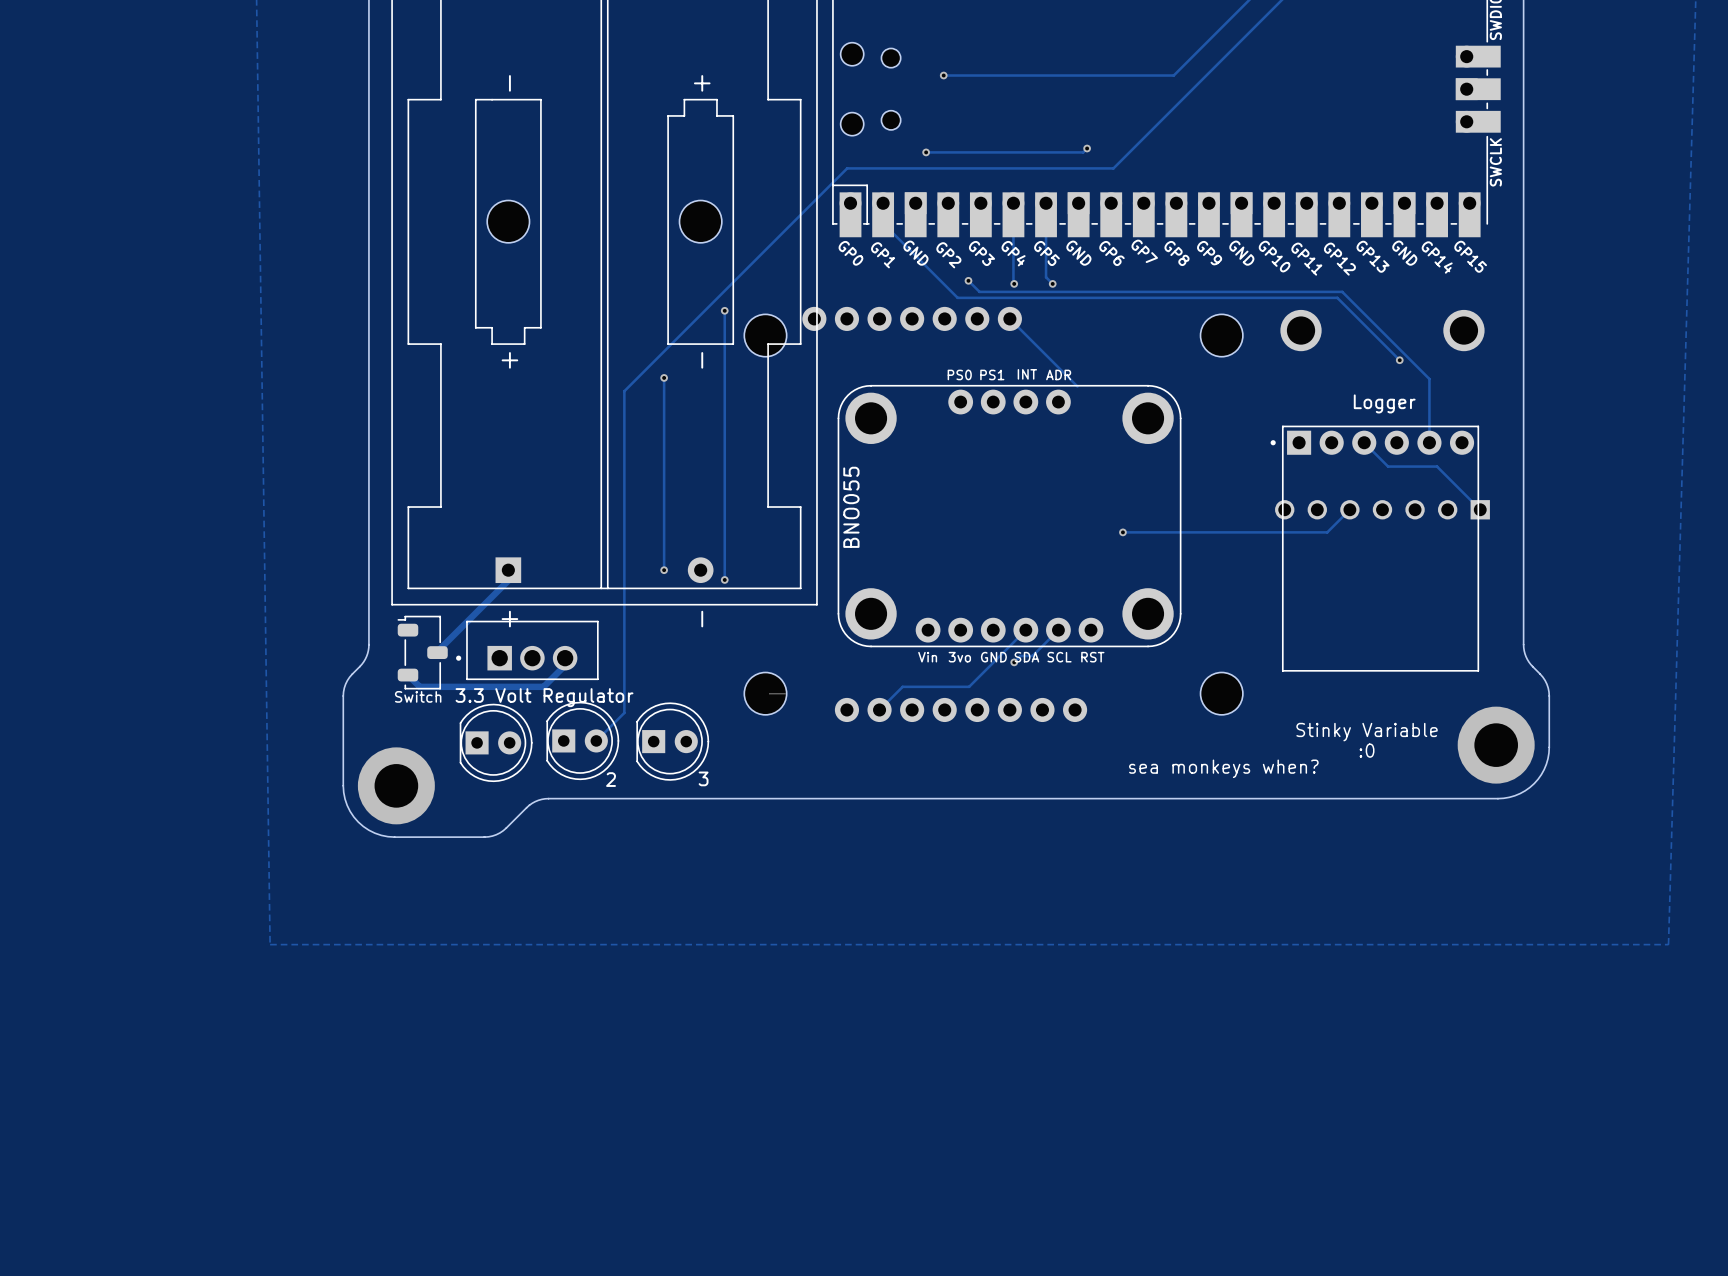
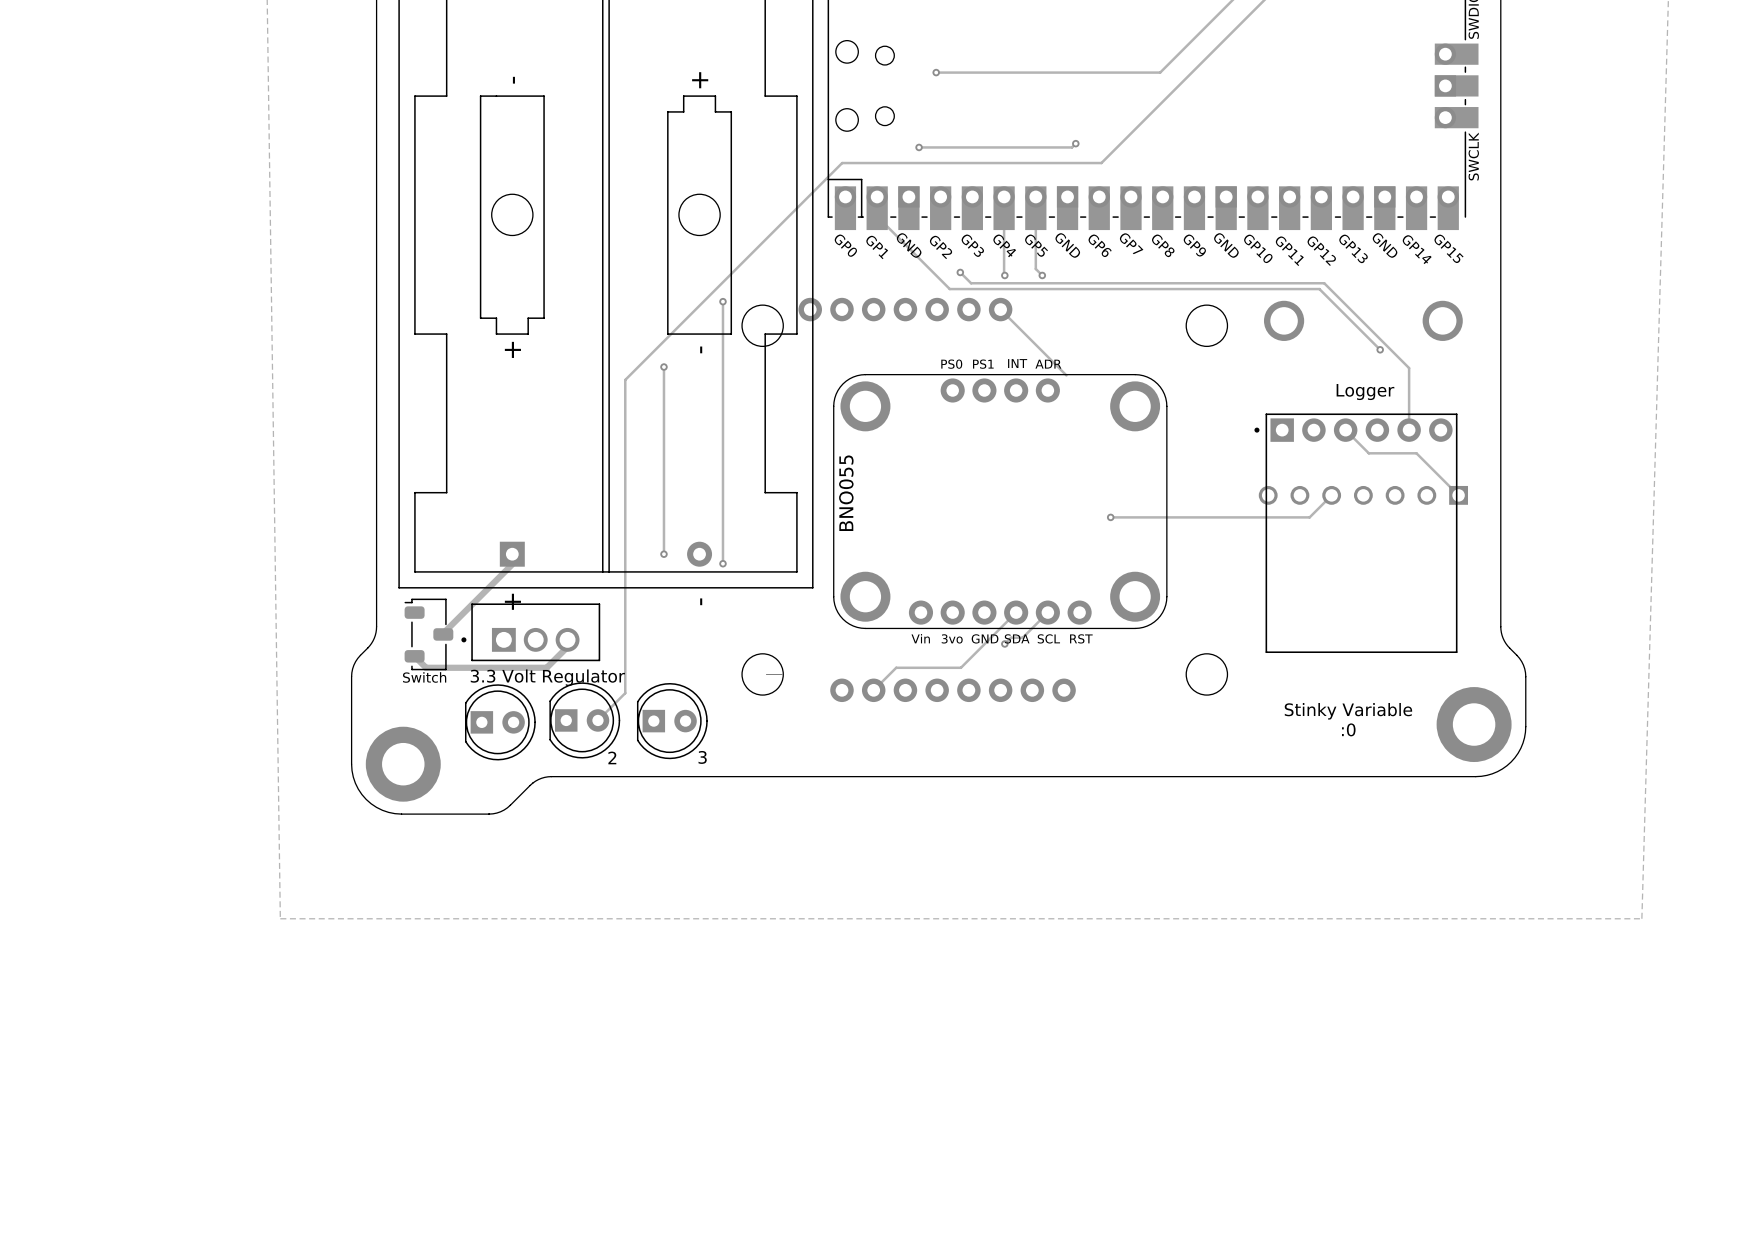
text: sea monkeys when? (1223, 768) -> none

